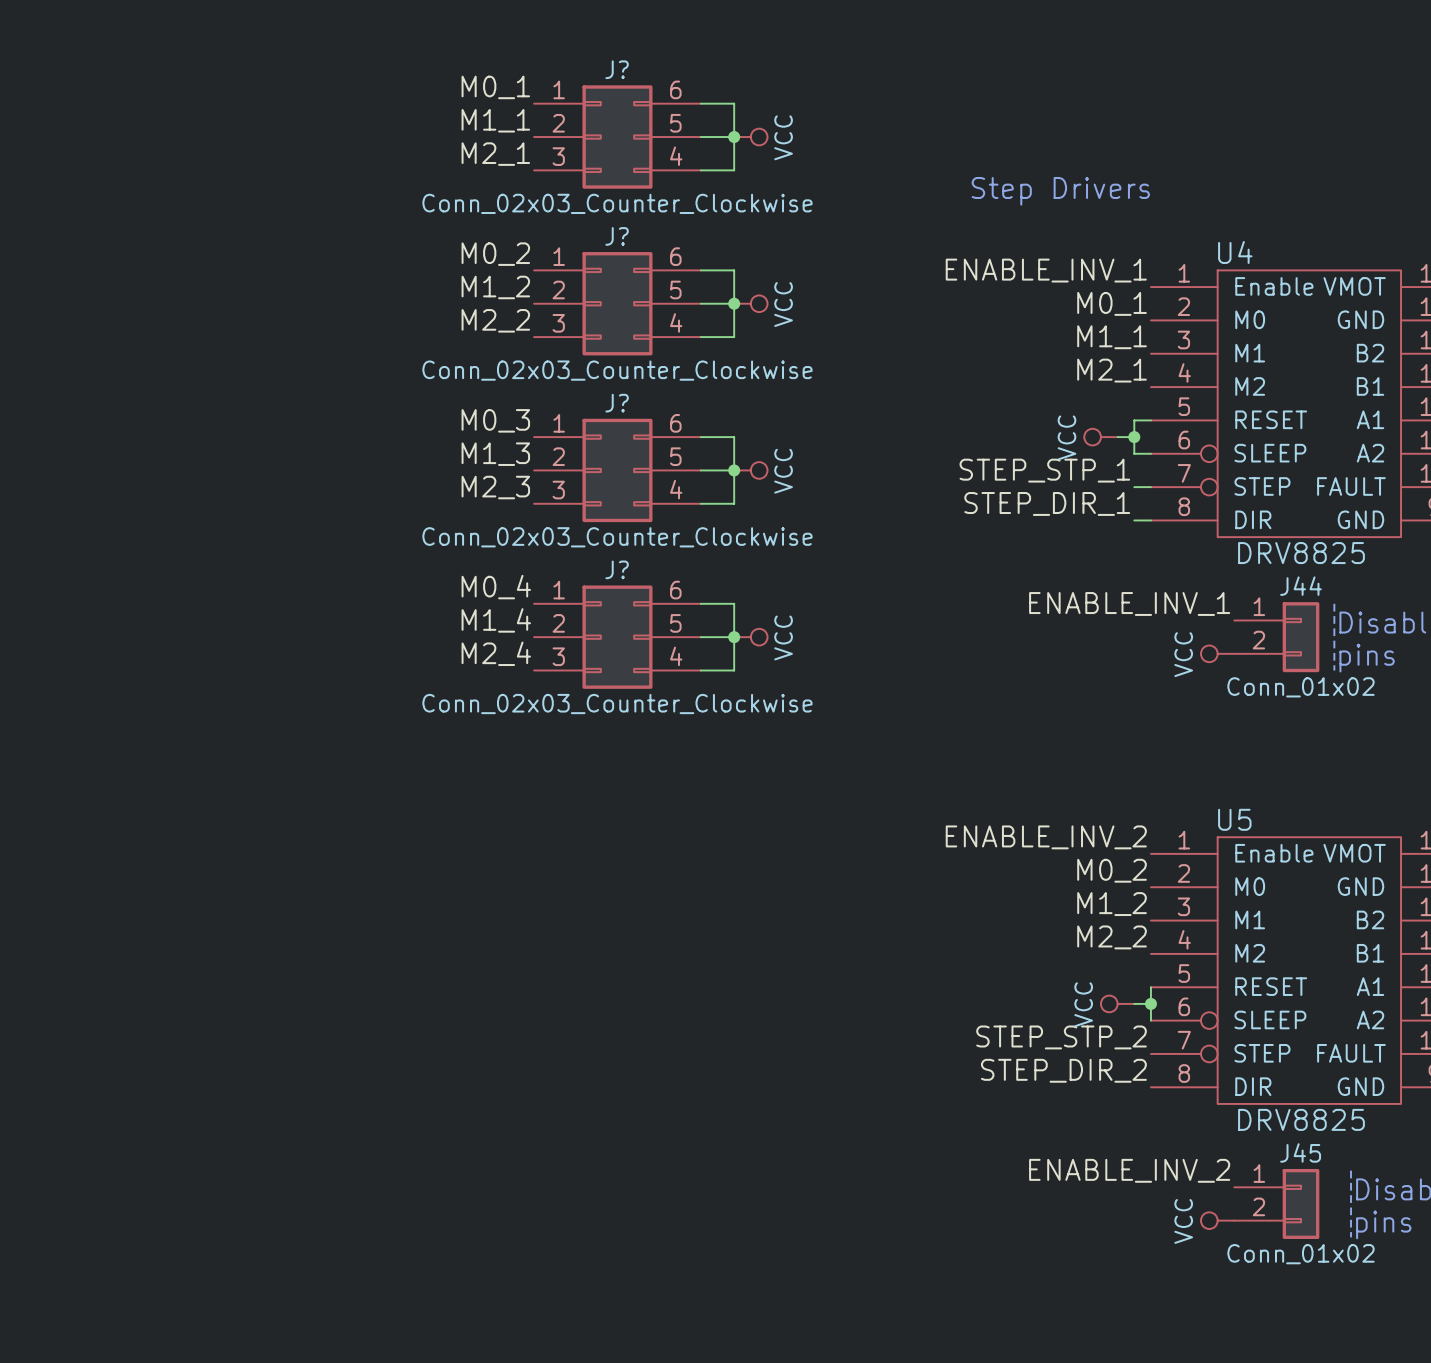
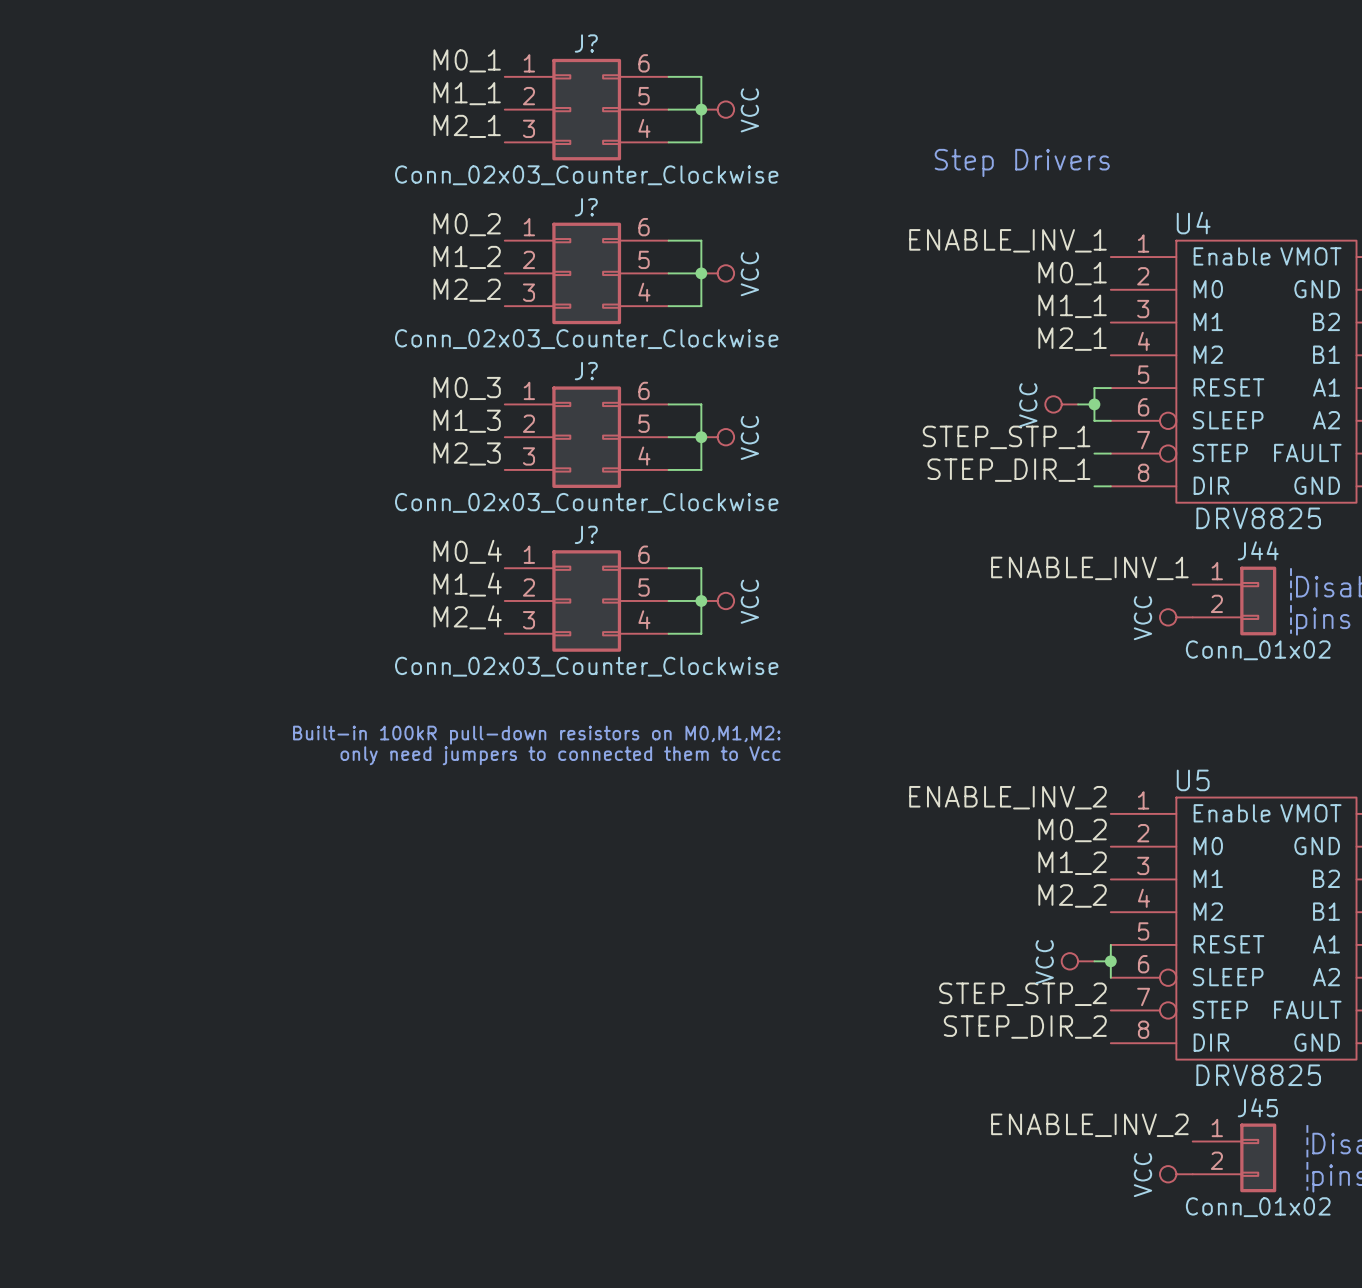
text: none -> Built-in 100kR pull-down resistors on M0,M1,M2: (536, 735)
text: none -> only need jumpers to connected them to Vcc (560, 755)

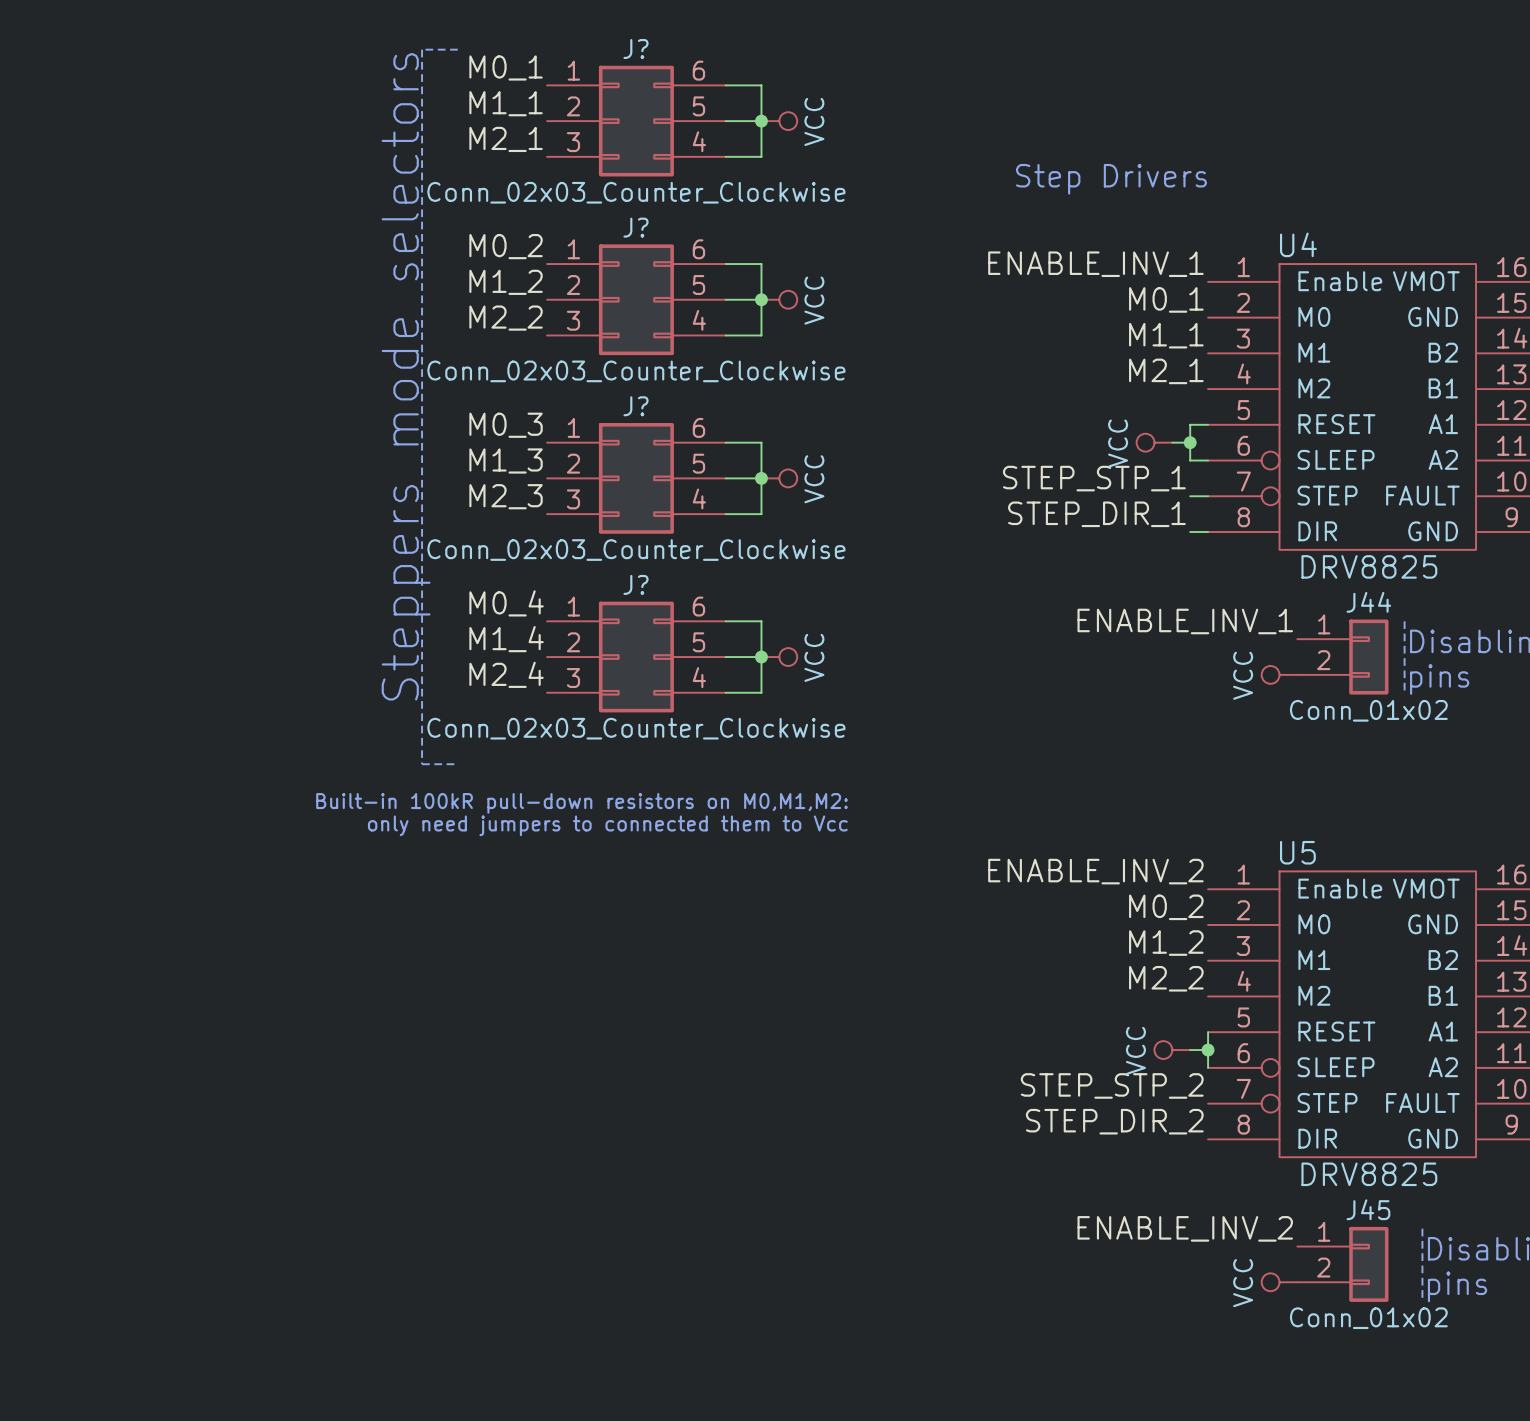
line: none -> (457, 49) (422, 49) (422, 764) (457, 764)
text: none -> Steppers mode selectors (406, 376)

